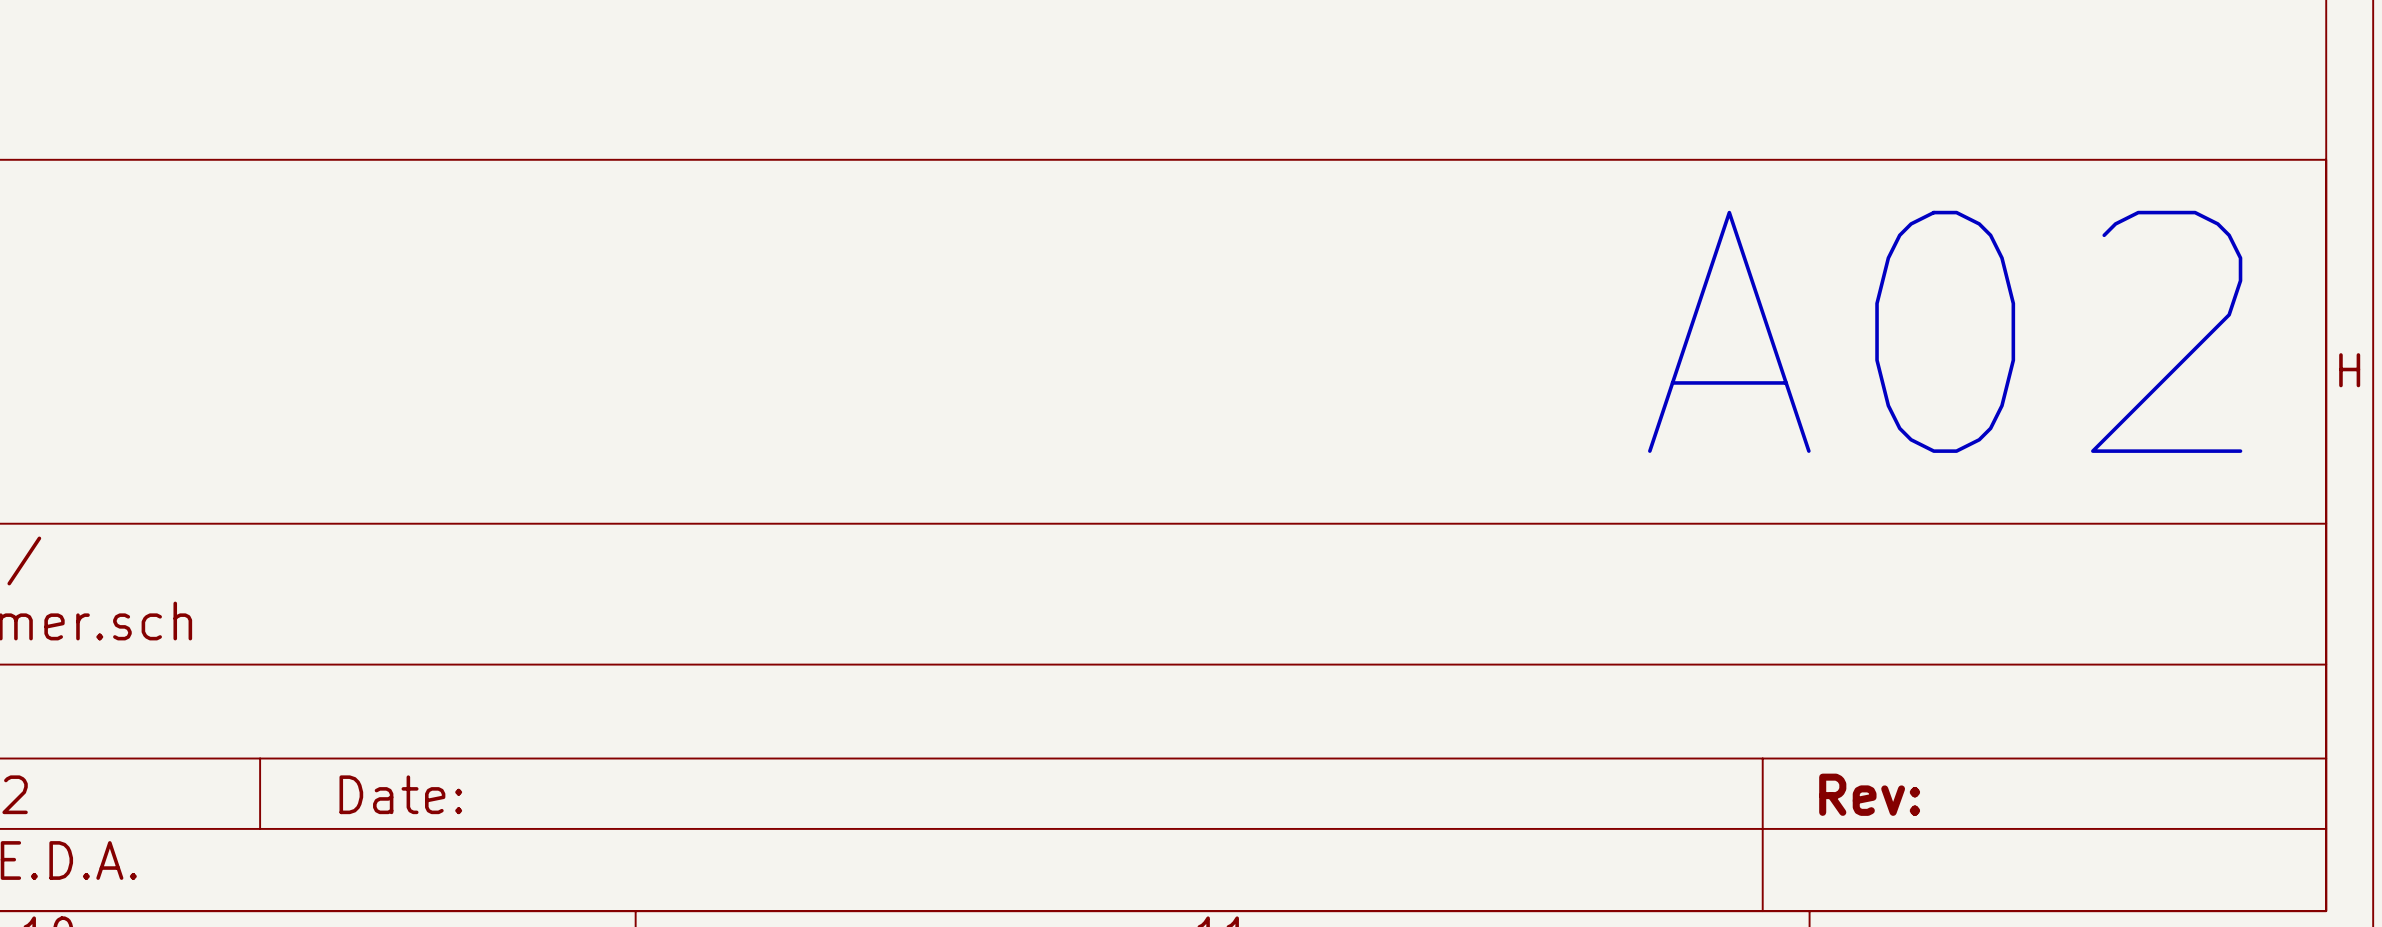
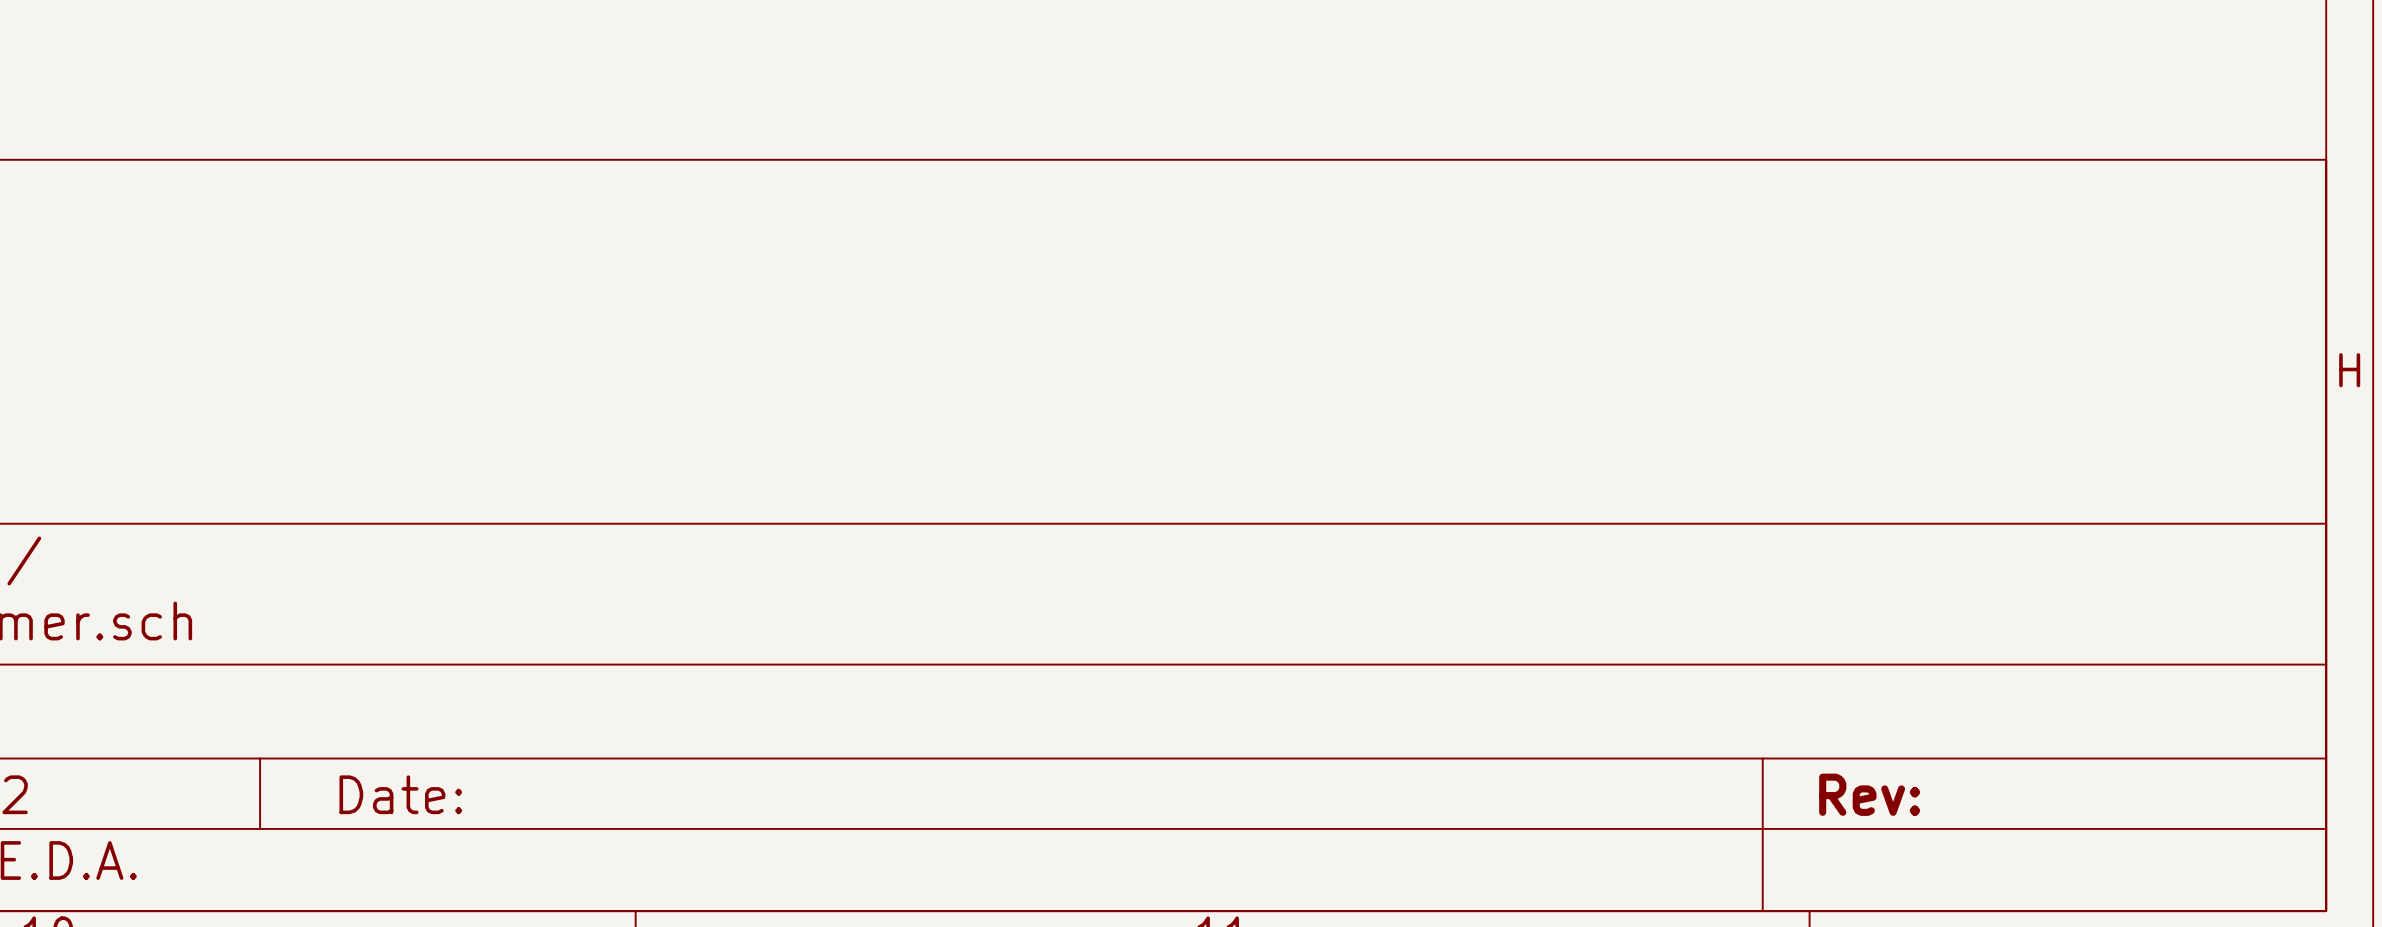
text: A02 (1945, 331) -> none

